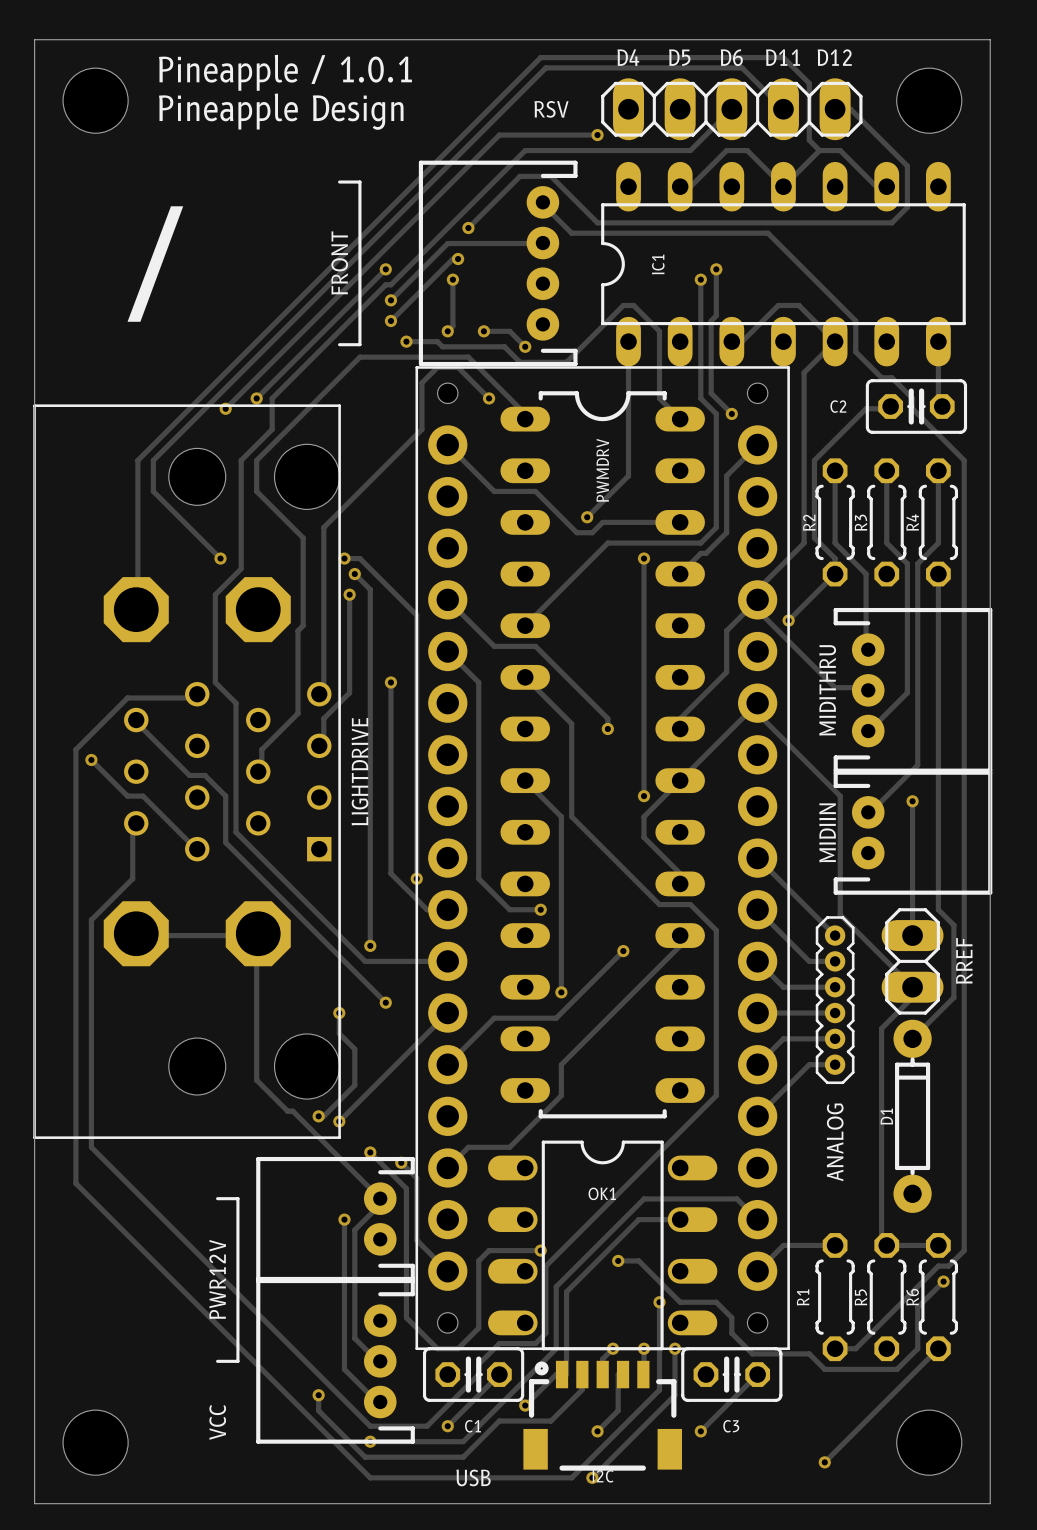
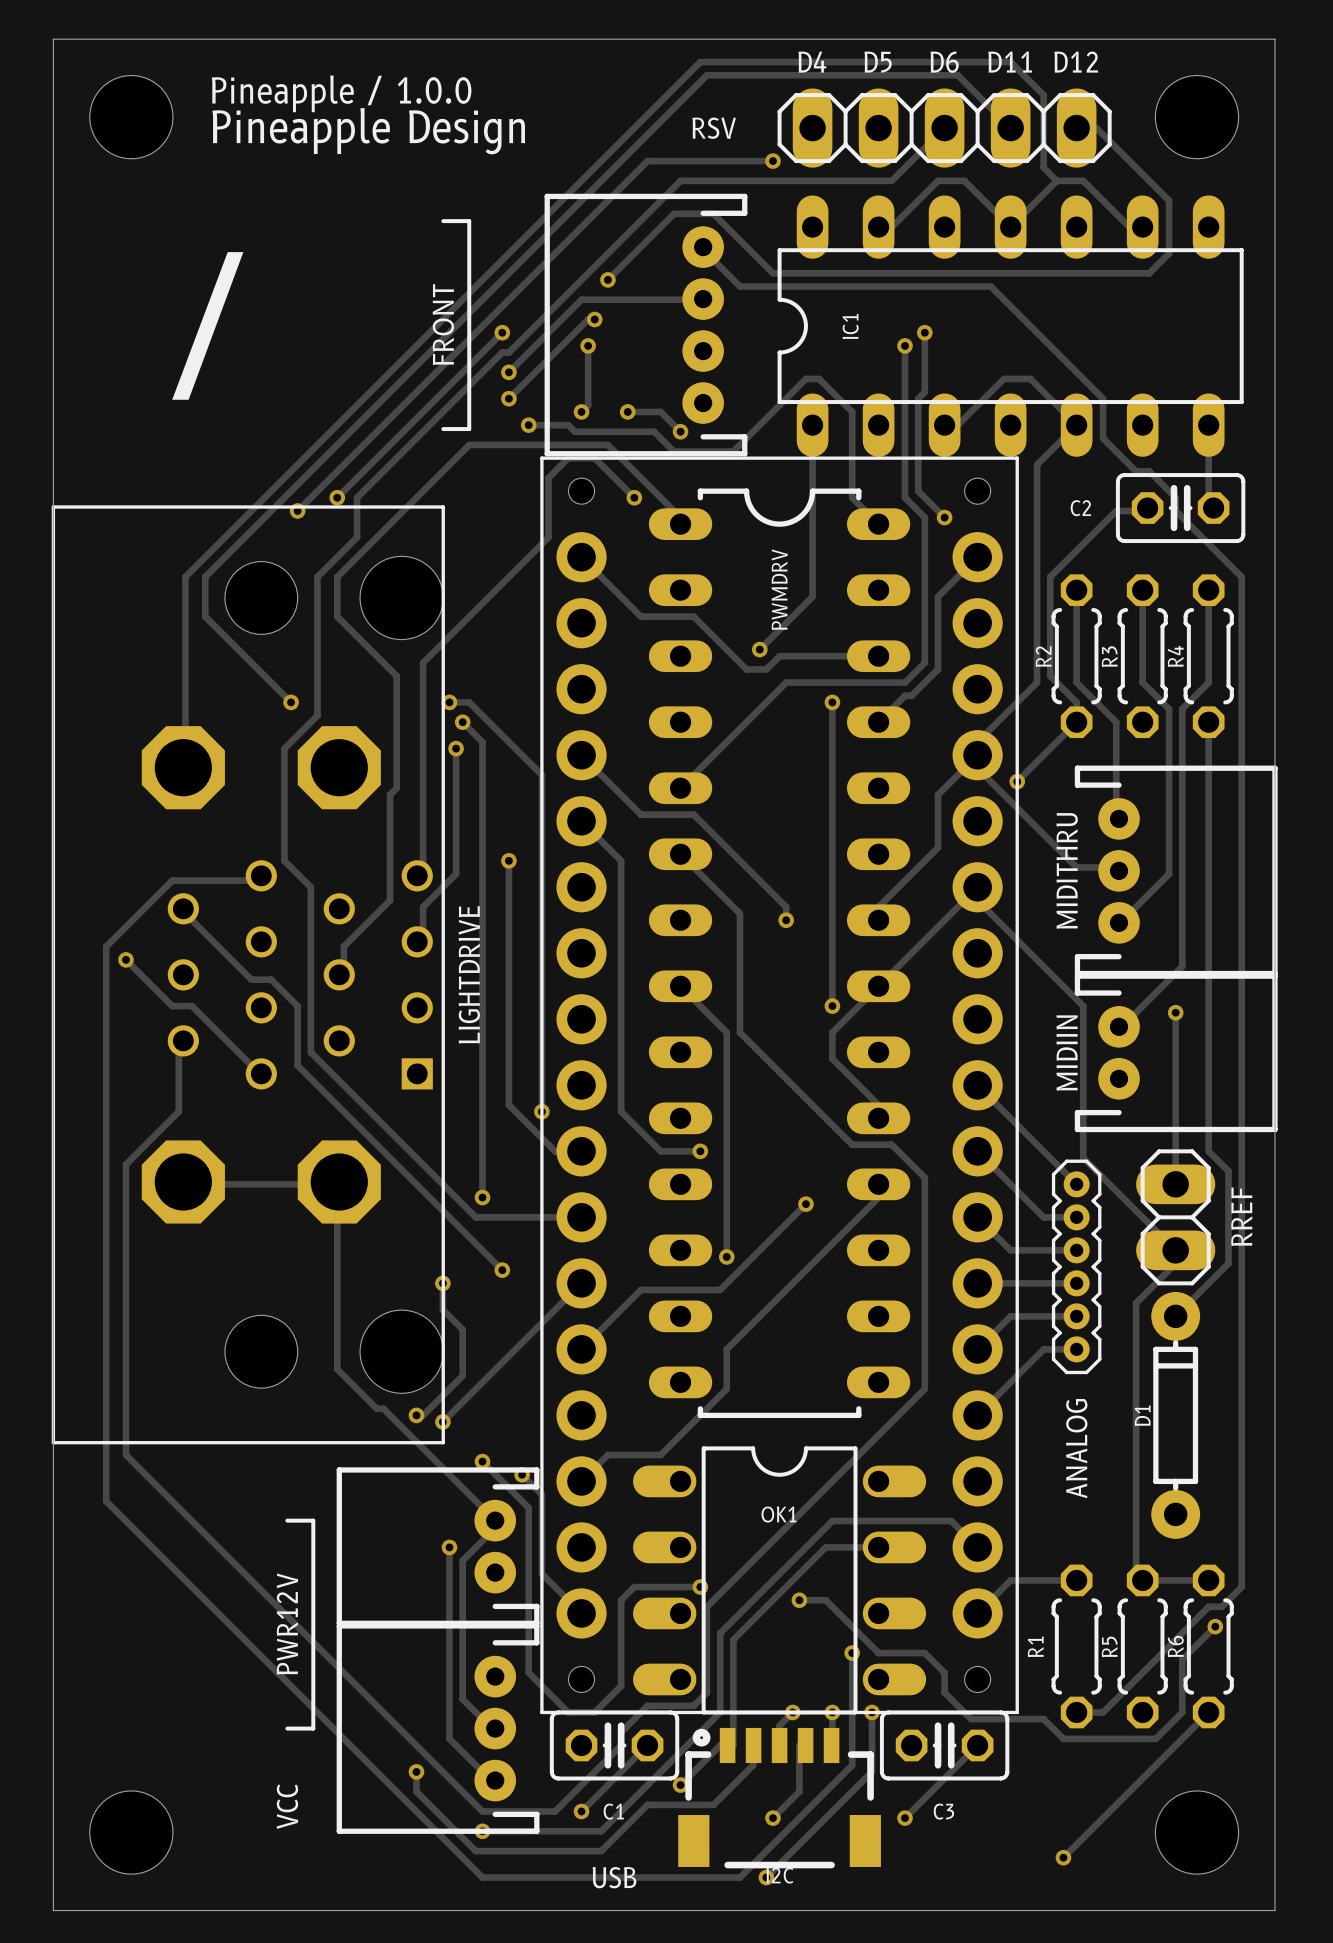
text: Pineapple / 1.0.1 (285, 72) -> Pineapple / 1.0.0 (341, 93)

